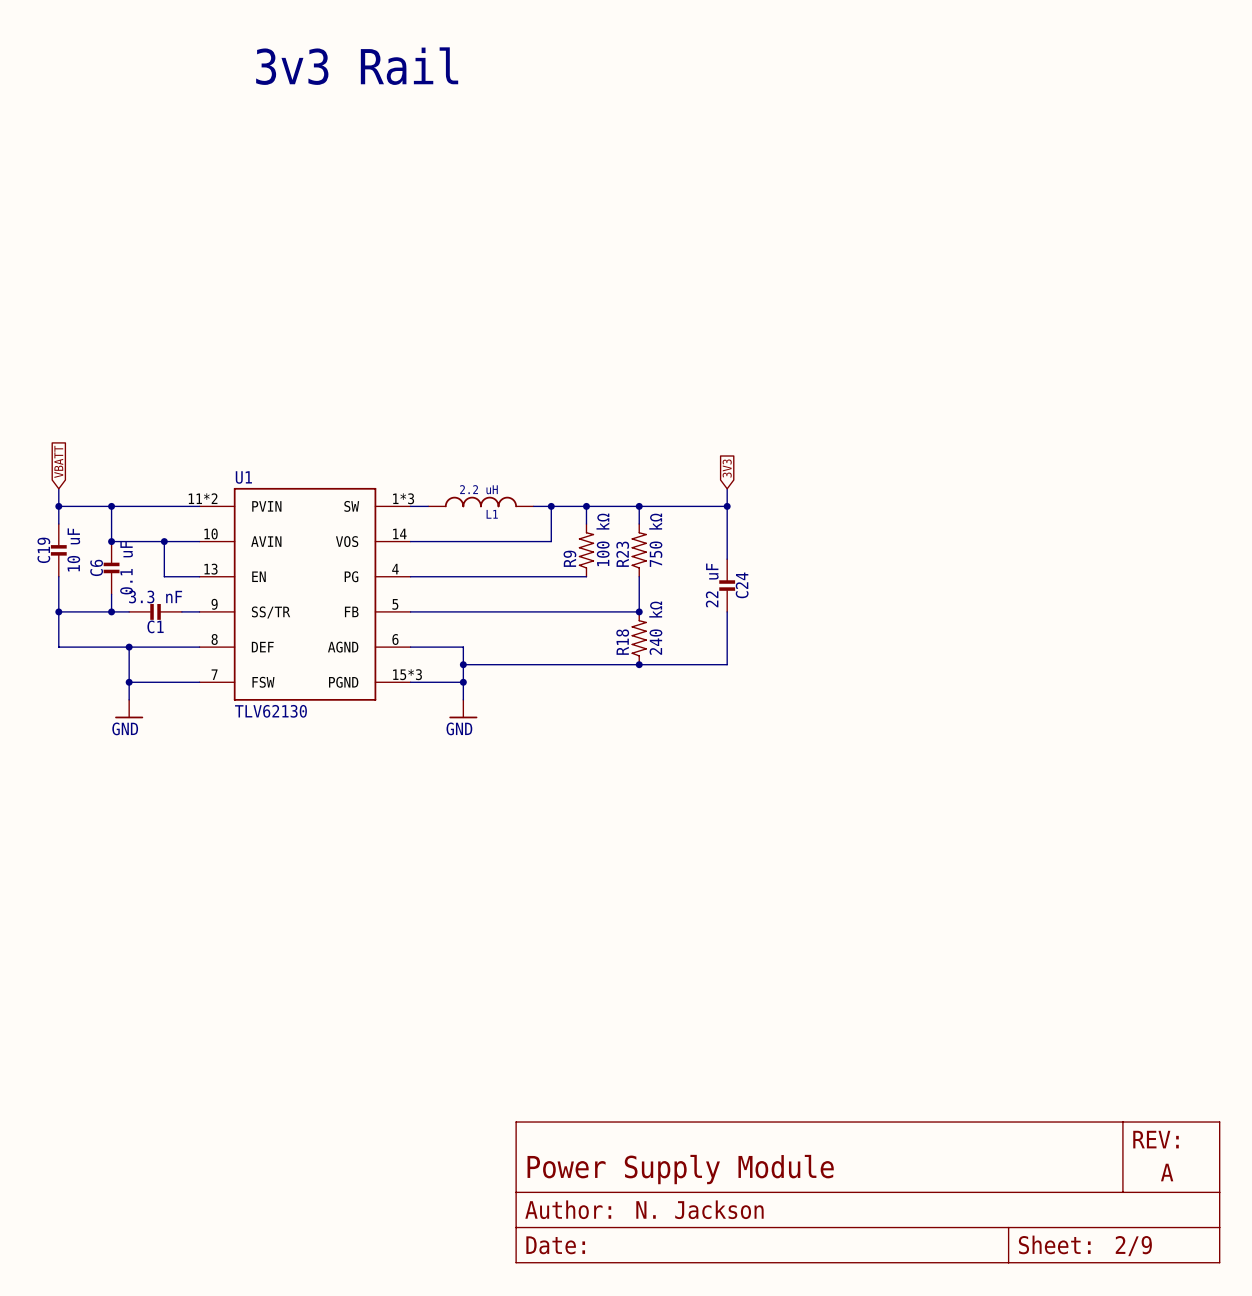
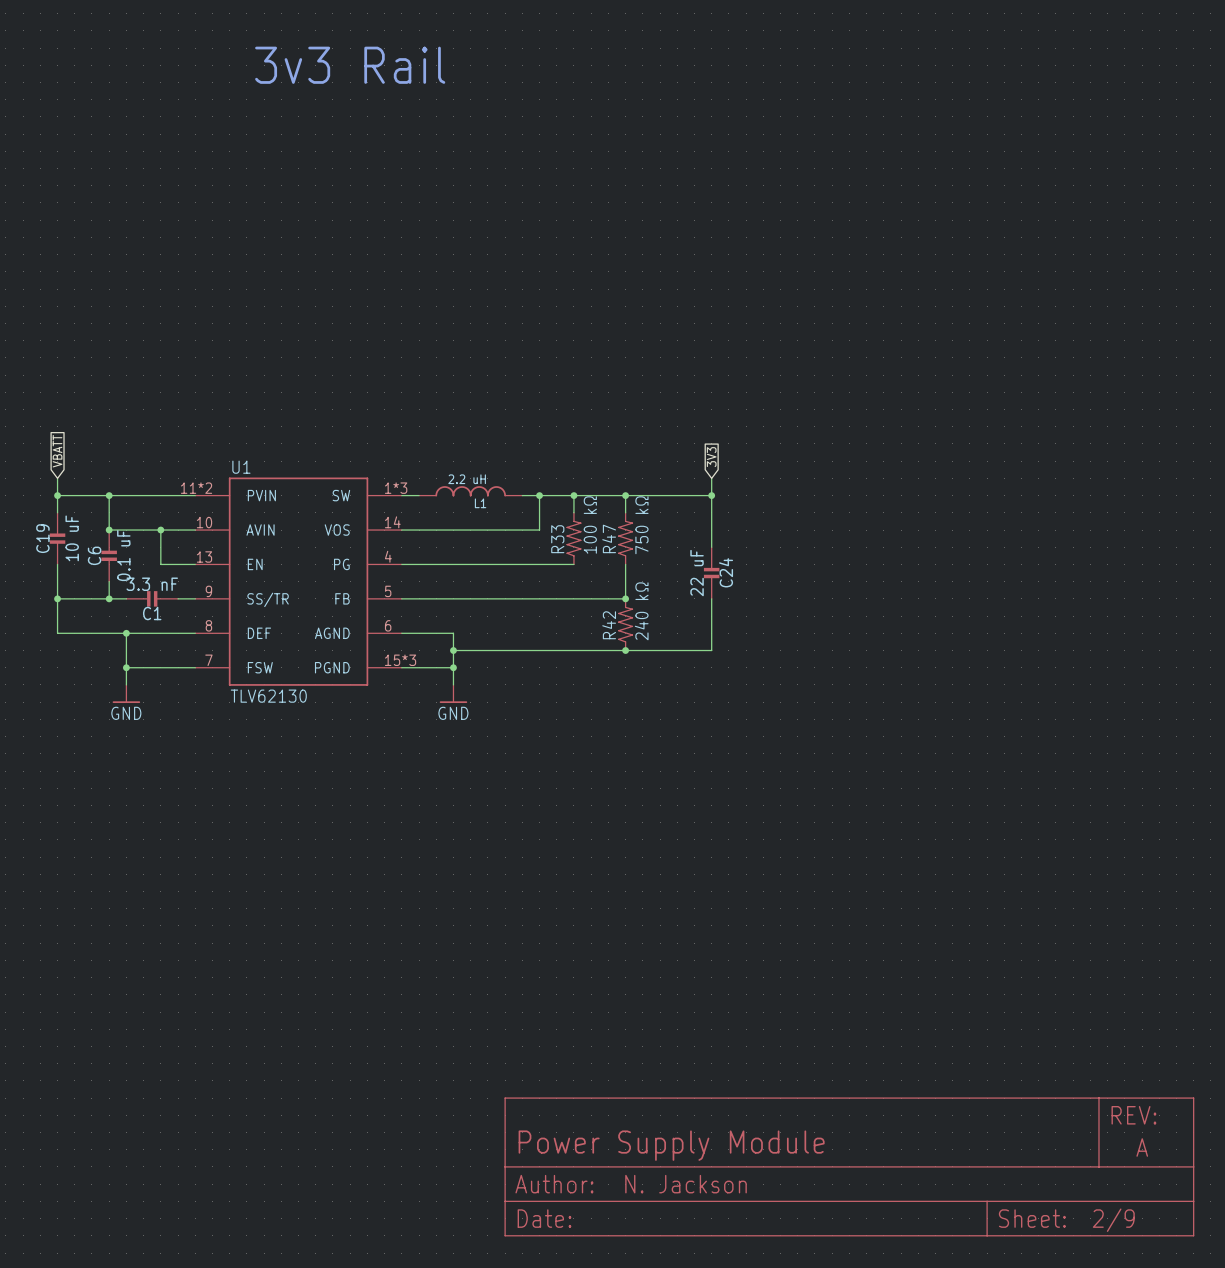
R23 name: R23 (622, 554) -> R47 (609, 538)
R9 name: R9 (569, 558) -> R33 (557, 539)
R18 name: R18 (622, 642) -> R42 (609, 625)

